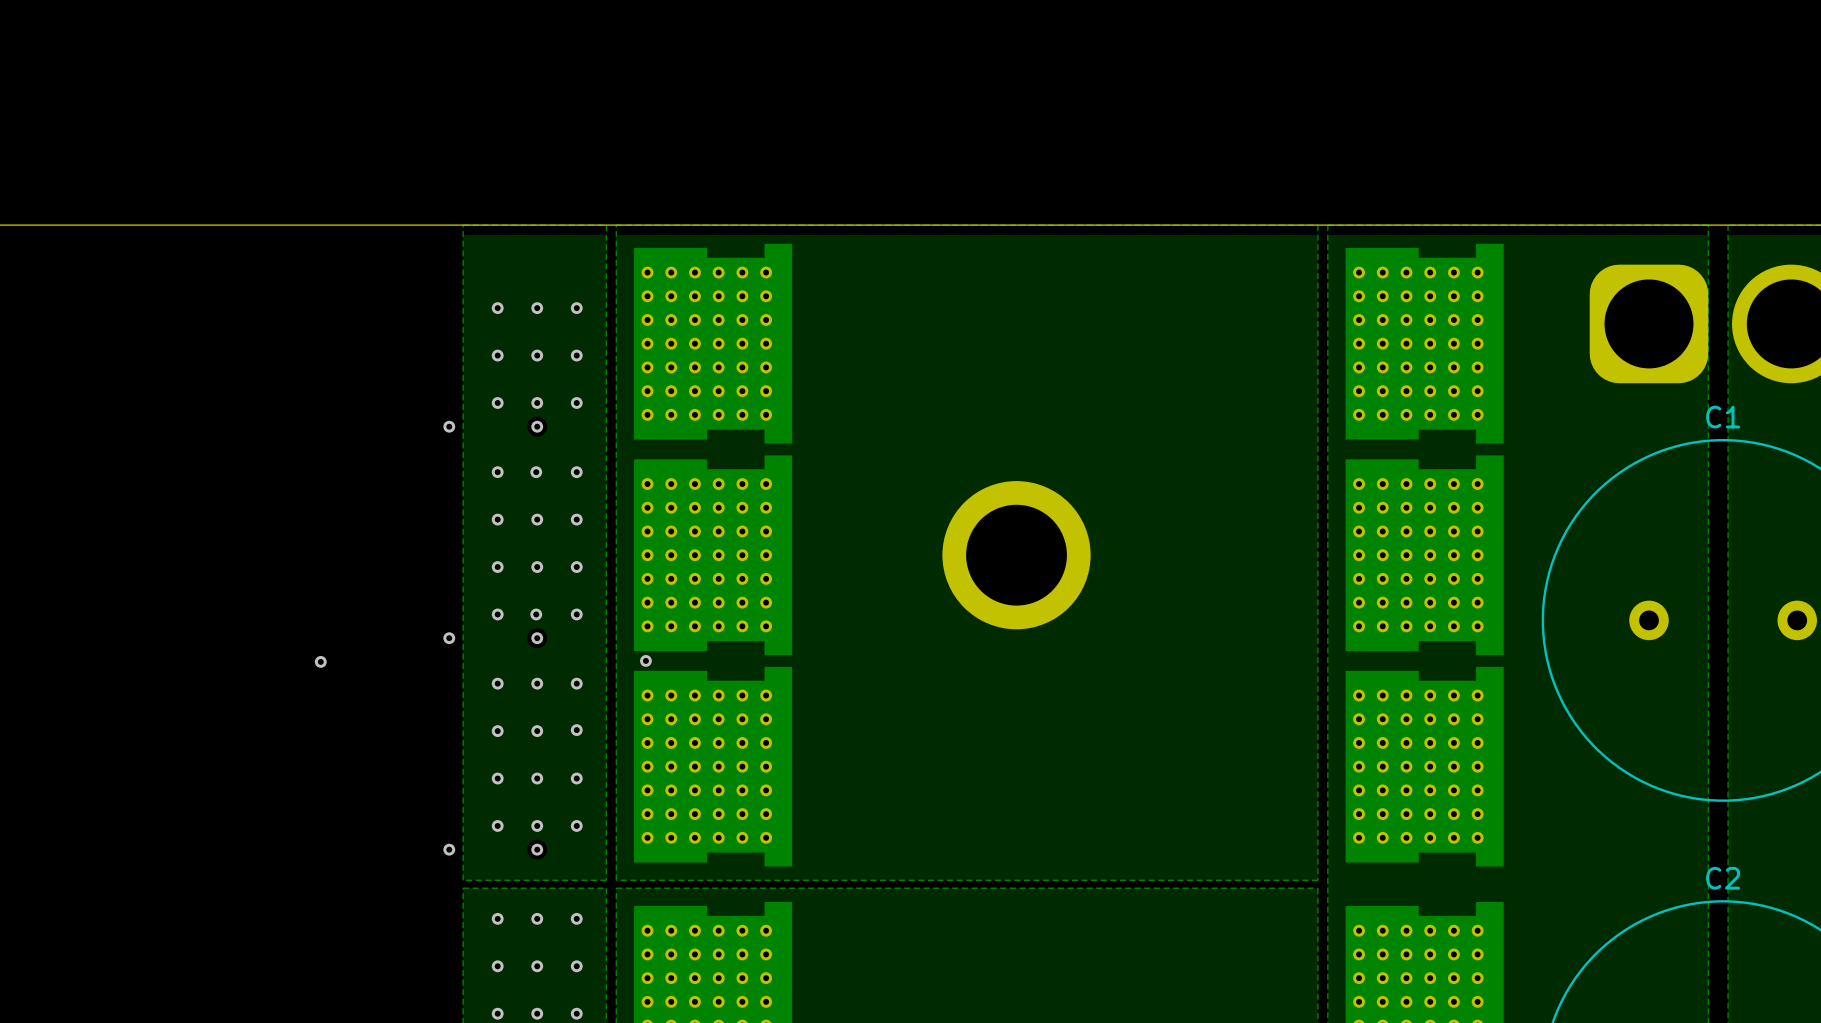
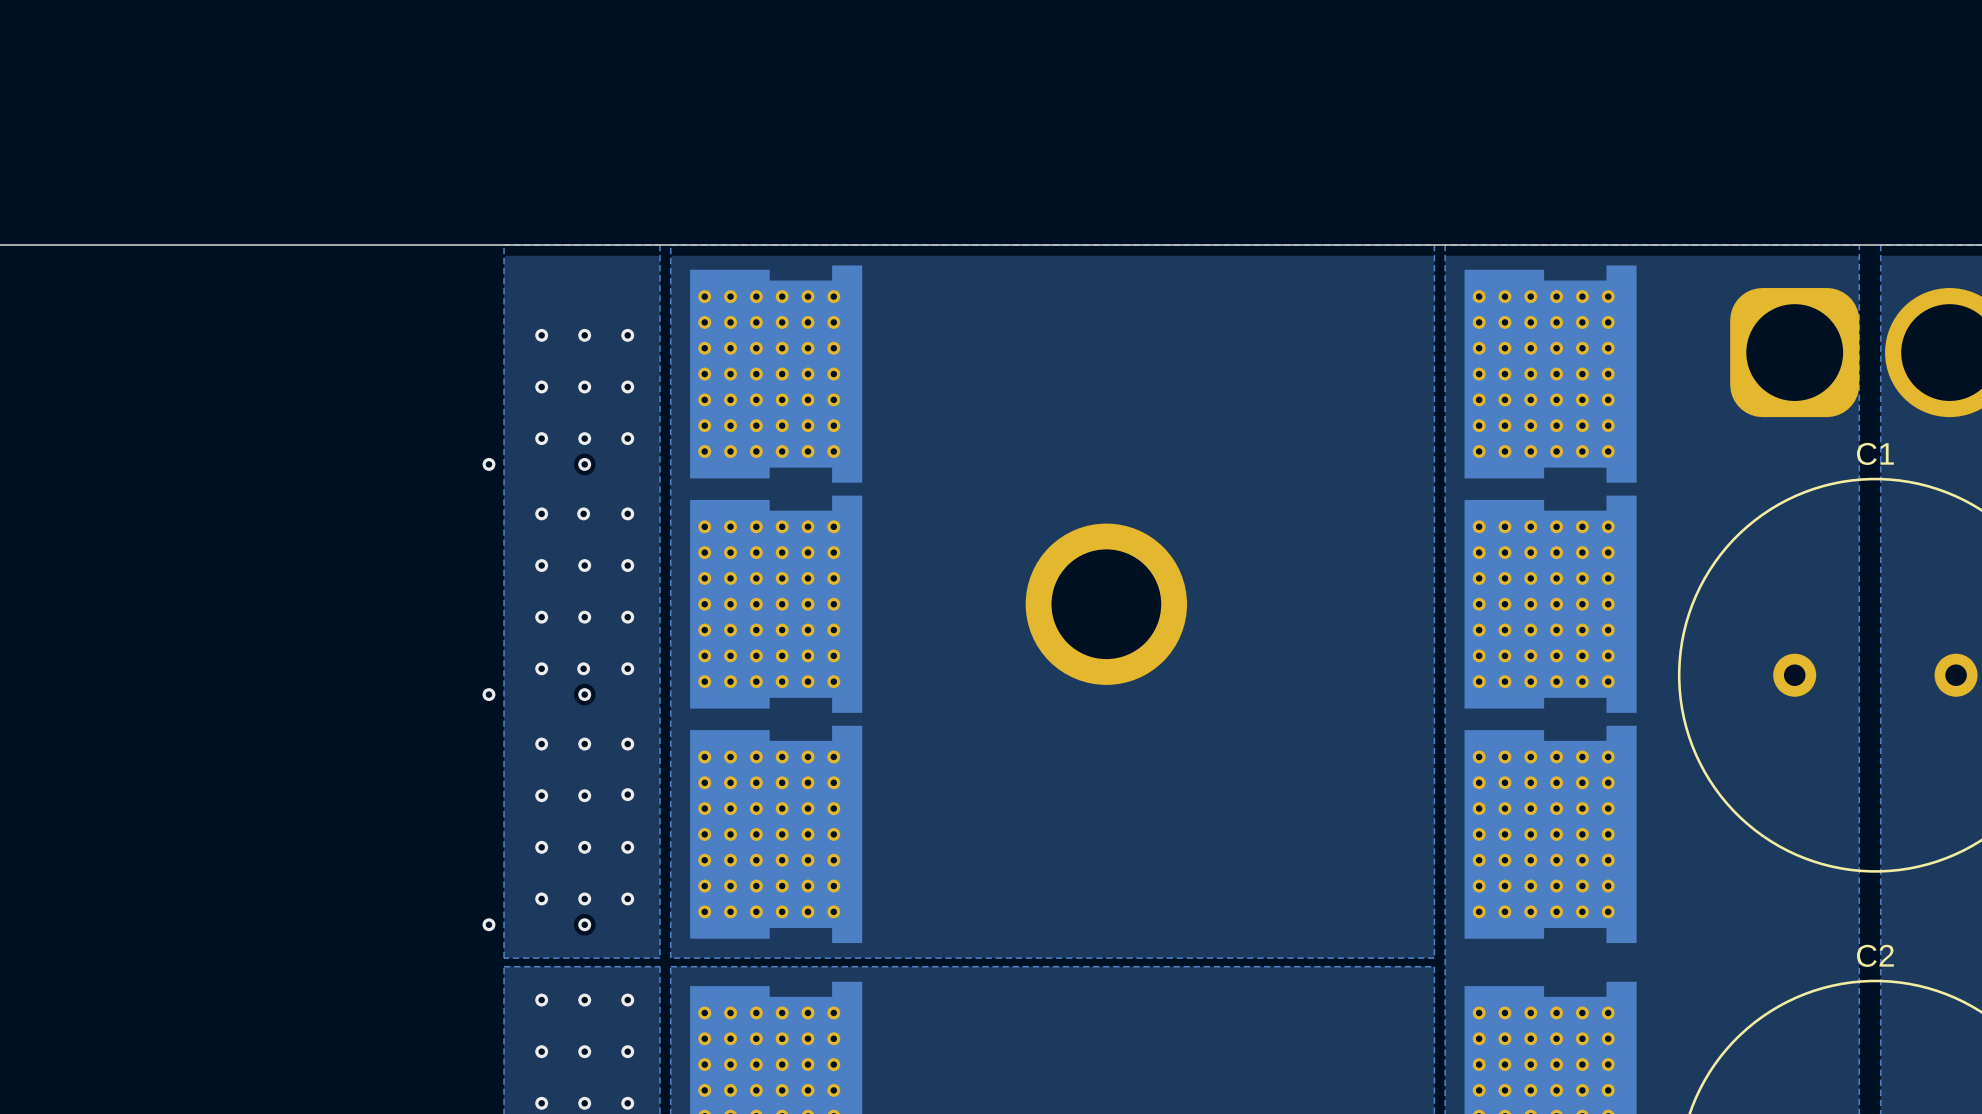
via: (645, 660) -> none
via: (320, 661) -> none

